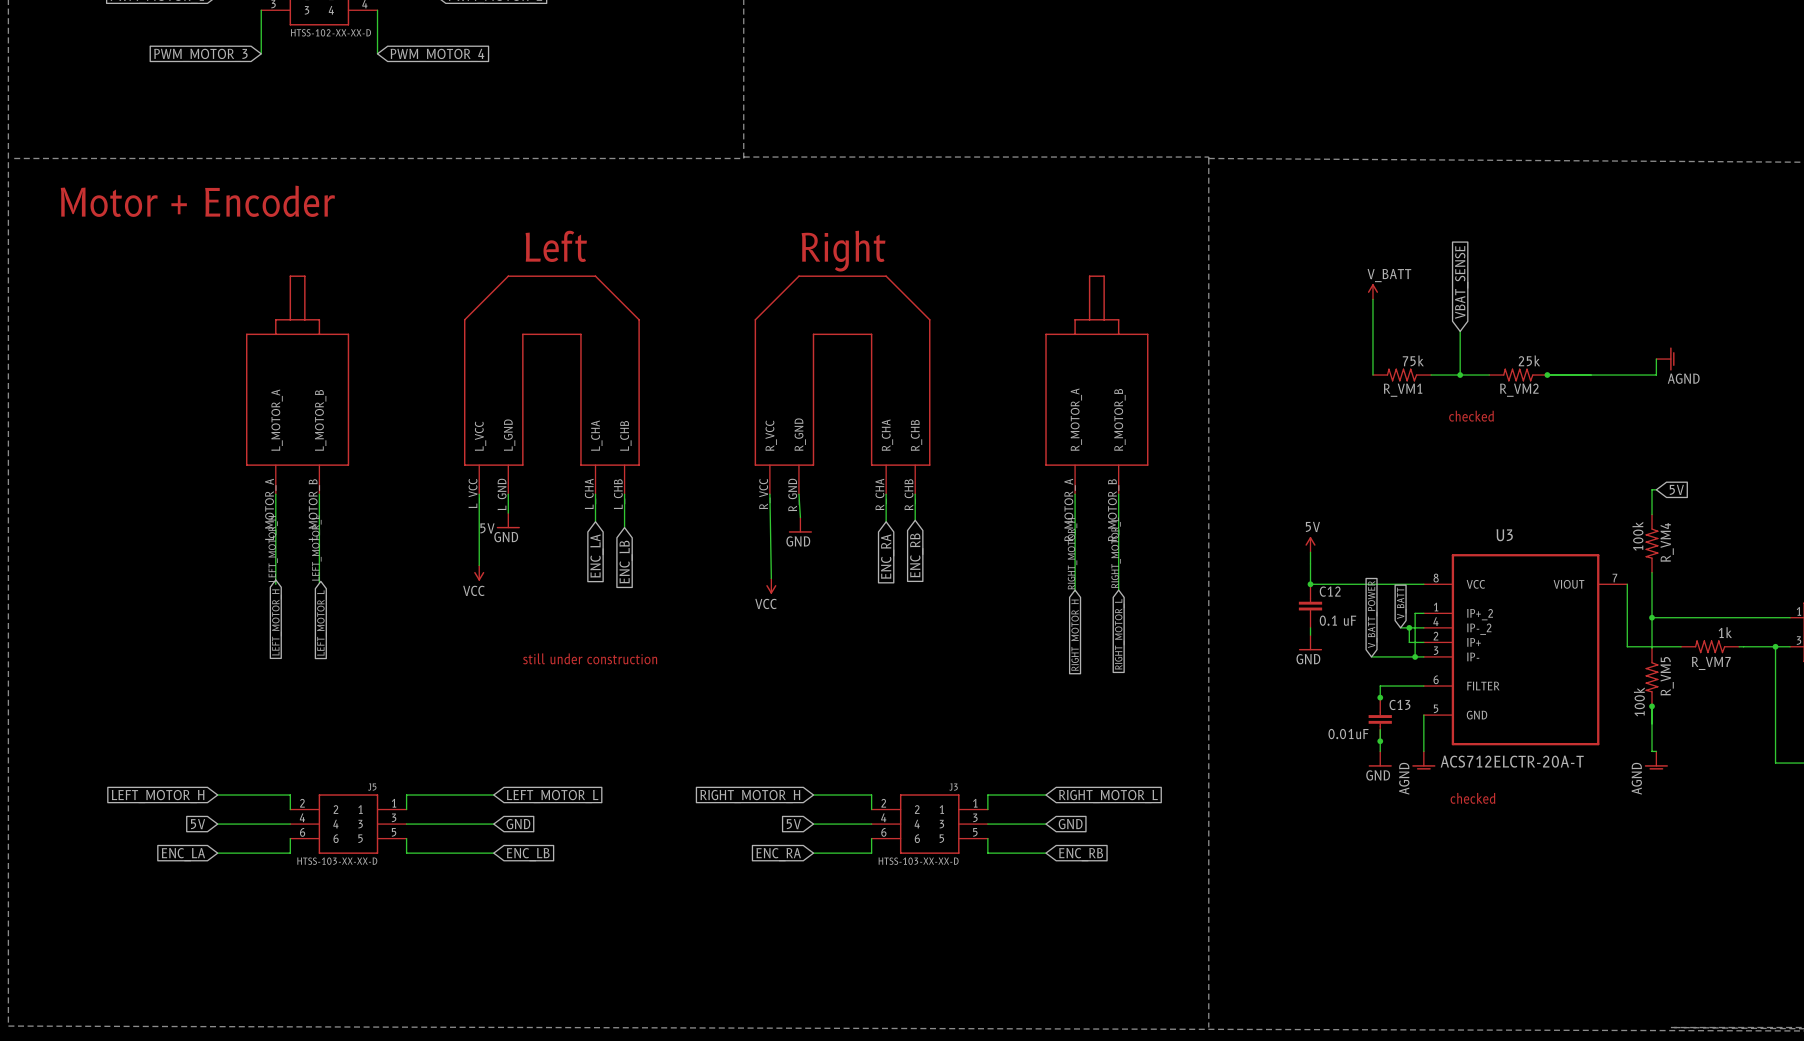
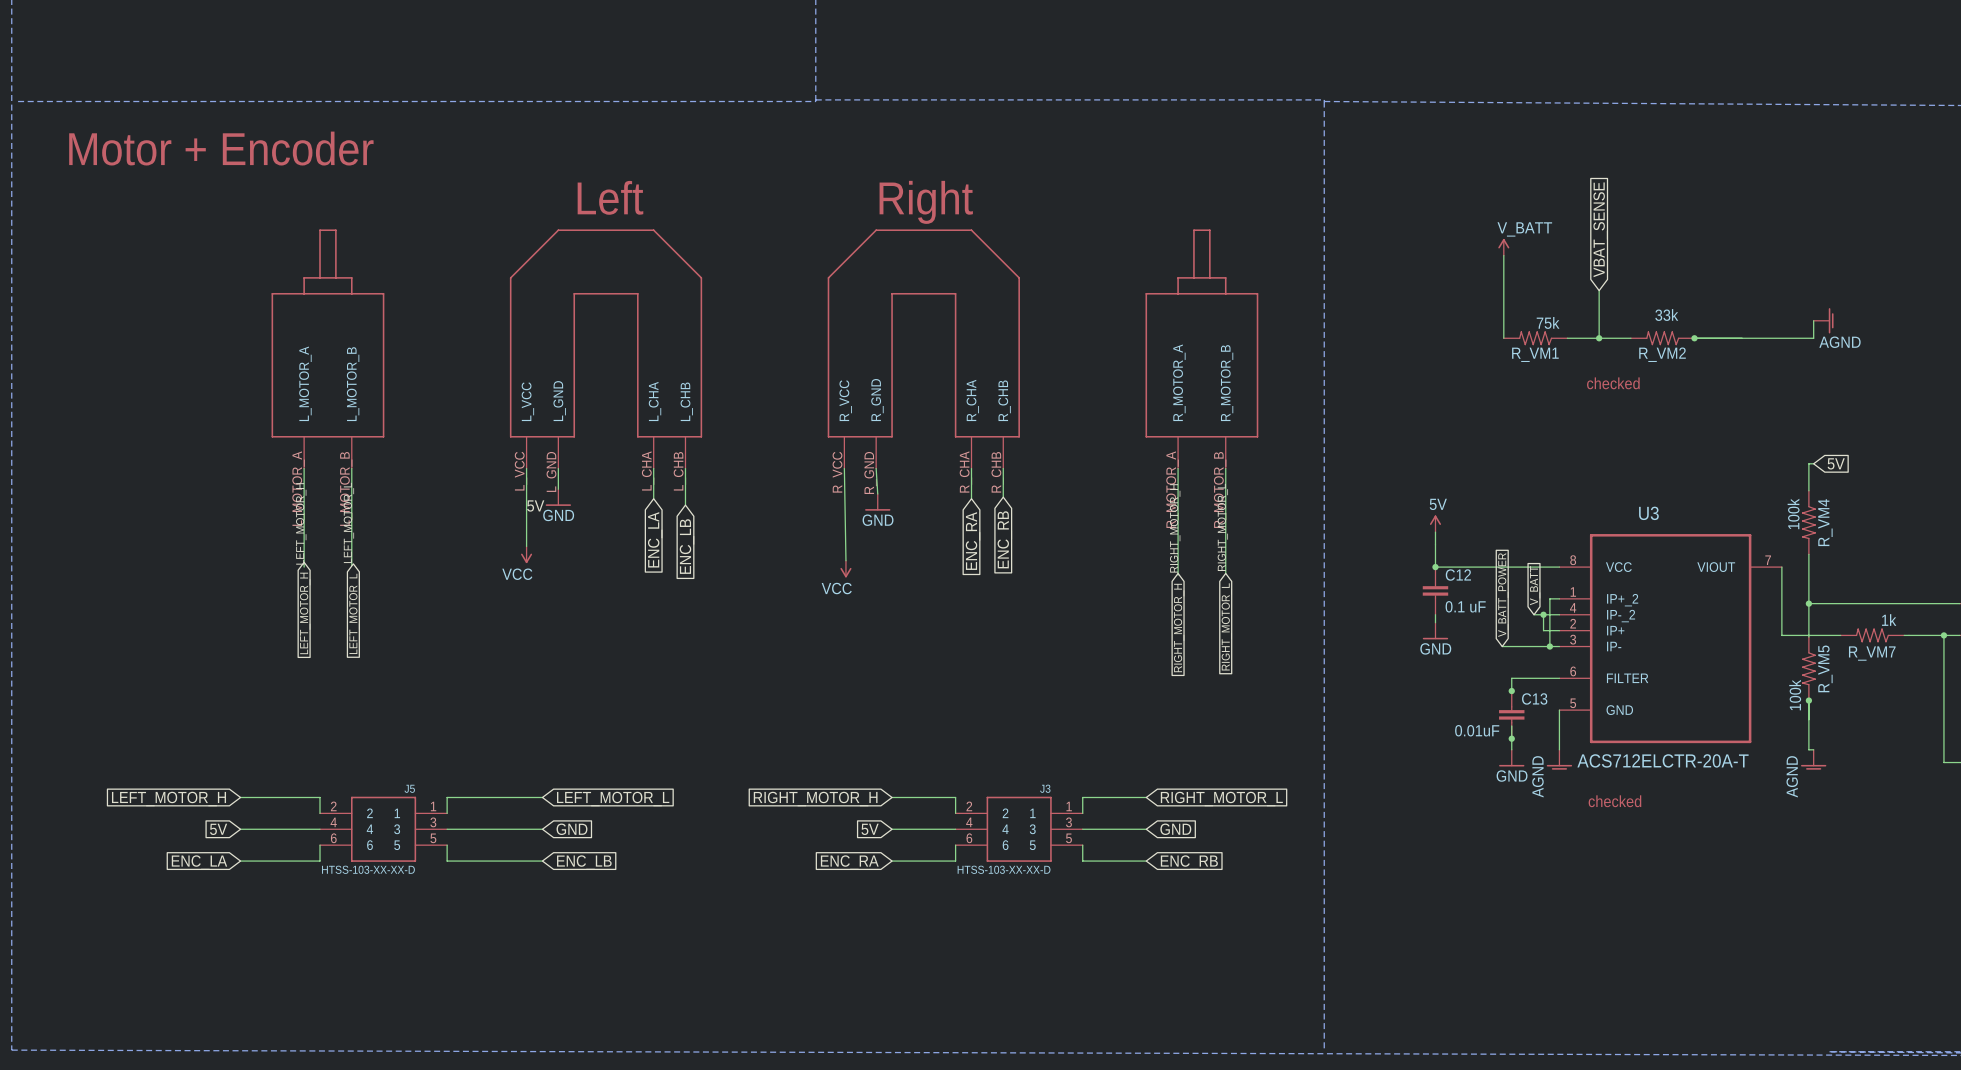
text: none -> 33k (1666, 315)
R_VM2 value: 25k (1529, 360) -> none
text: still under construction (590, 658) -> none

